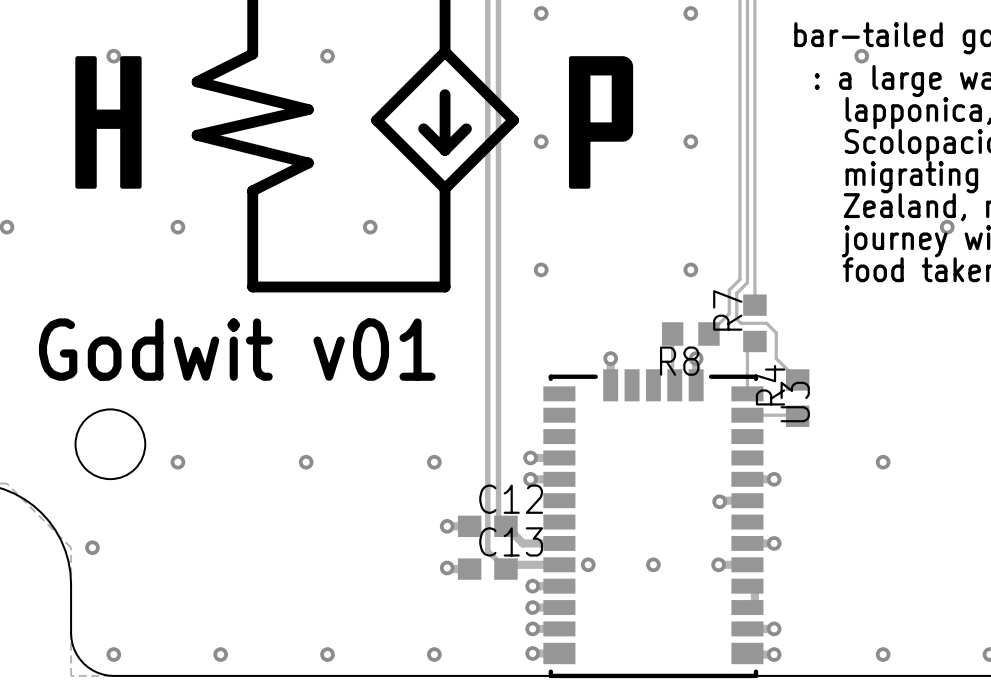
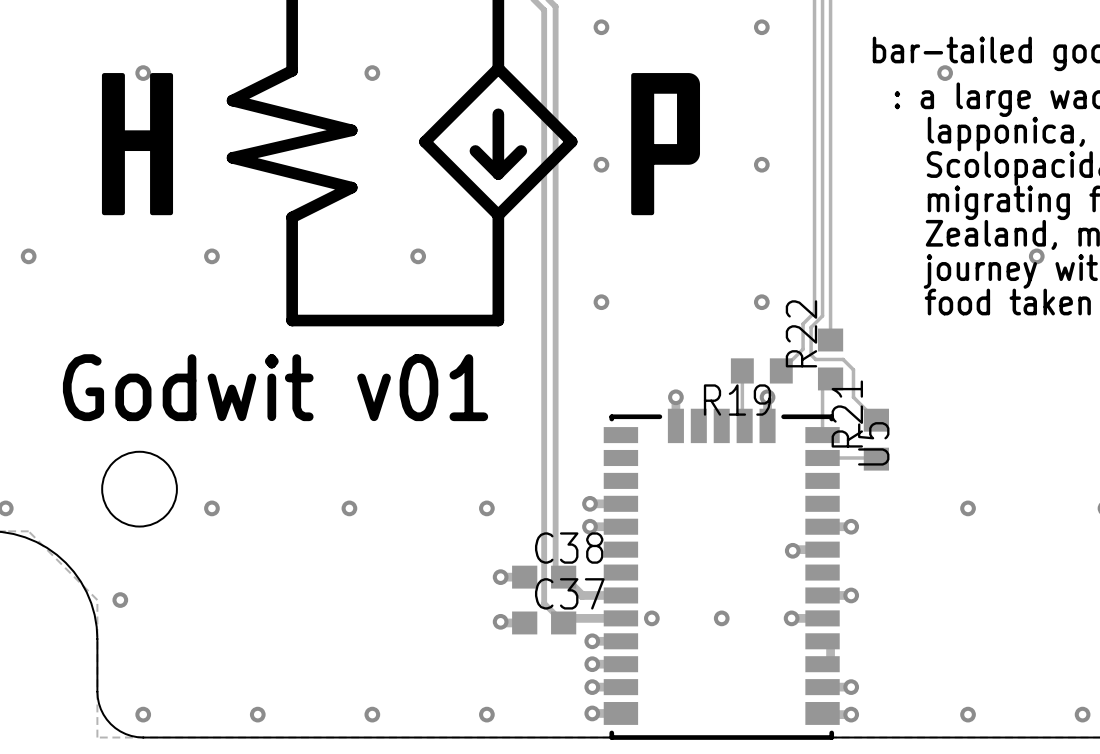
R7 name: R7 (727, 310) -> R22 (801, 333)
R8 name: R8 (679, 361) -> R19 (737, 400)
R4 name: R4 (769, 385) -> R21 (847, 414)
U3 name: U3 (795, 402) -> U5 (873, 443)
C12 name: C12 (511, 499) -> C38 (569, 548)
C13 name: C13 (511, 541) -> C37 (569, 593)

